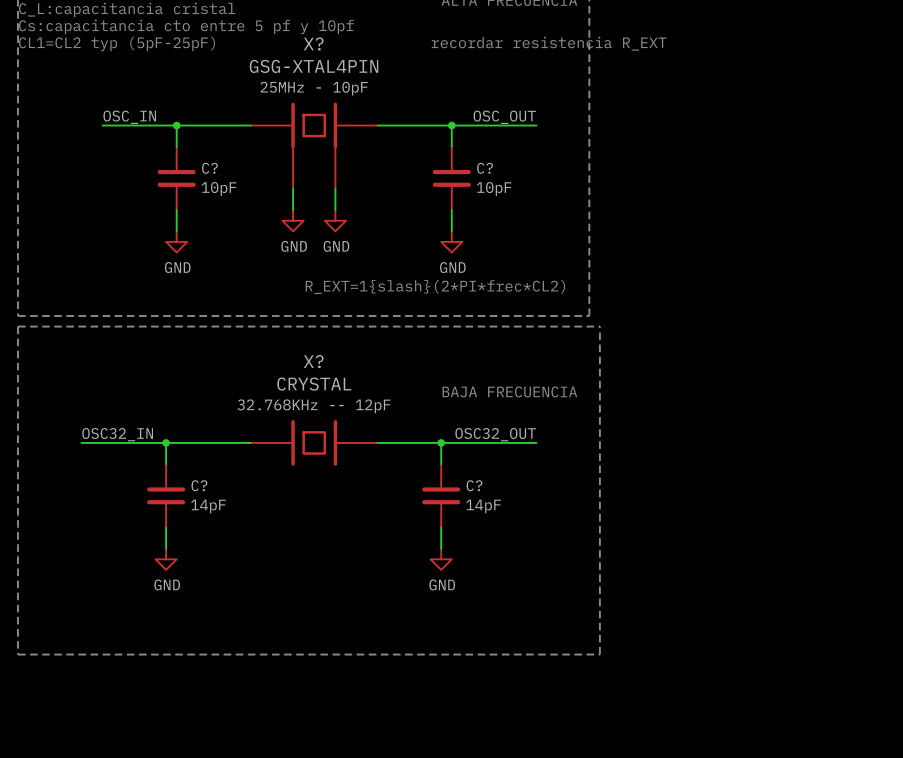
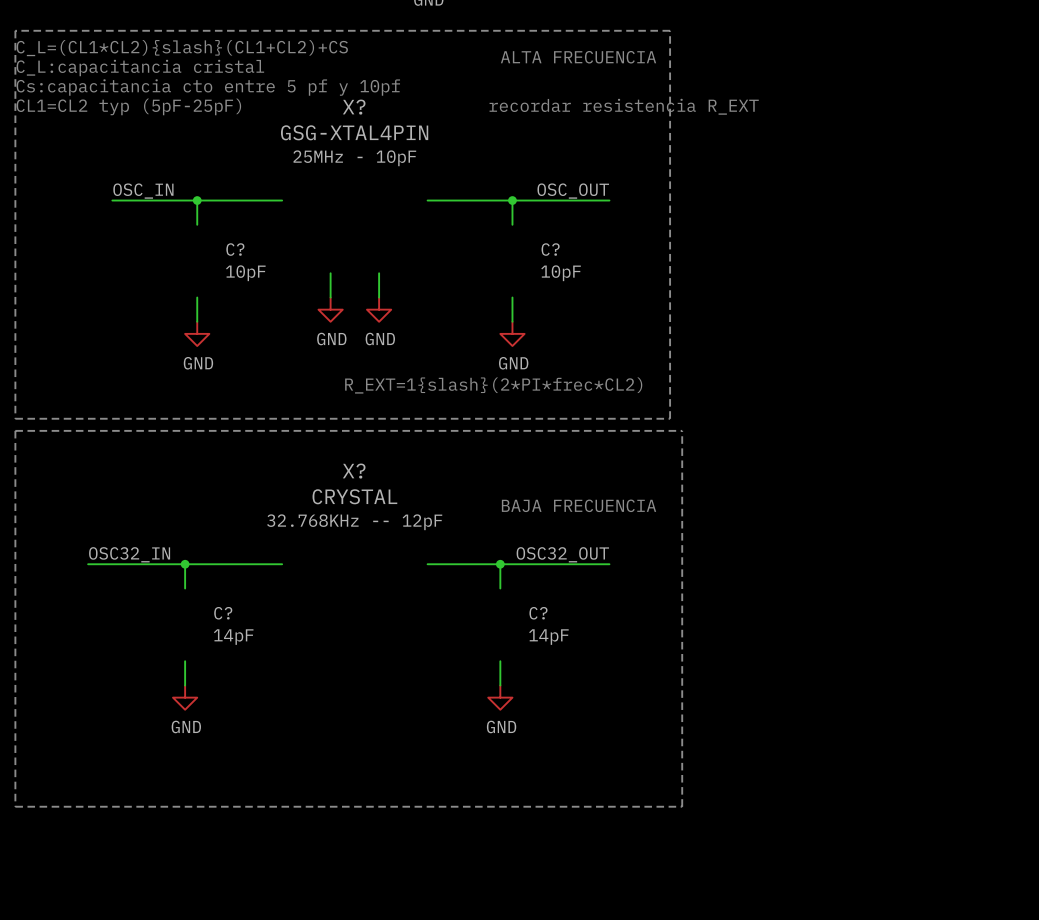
X?: GSG-XTAL4PIN (314, 145) -> none
C?: 10pF (176, 178) -> none
C?: 10pF (451, 178) -> none
X?: CRYSTAL (314, 442) -> none
C?: 14pF (166, 495) -> none
C?: 14pF (441, 495) -> none

